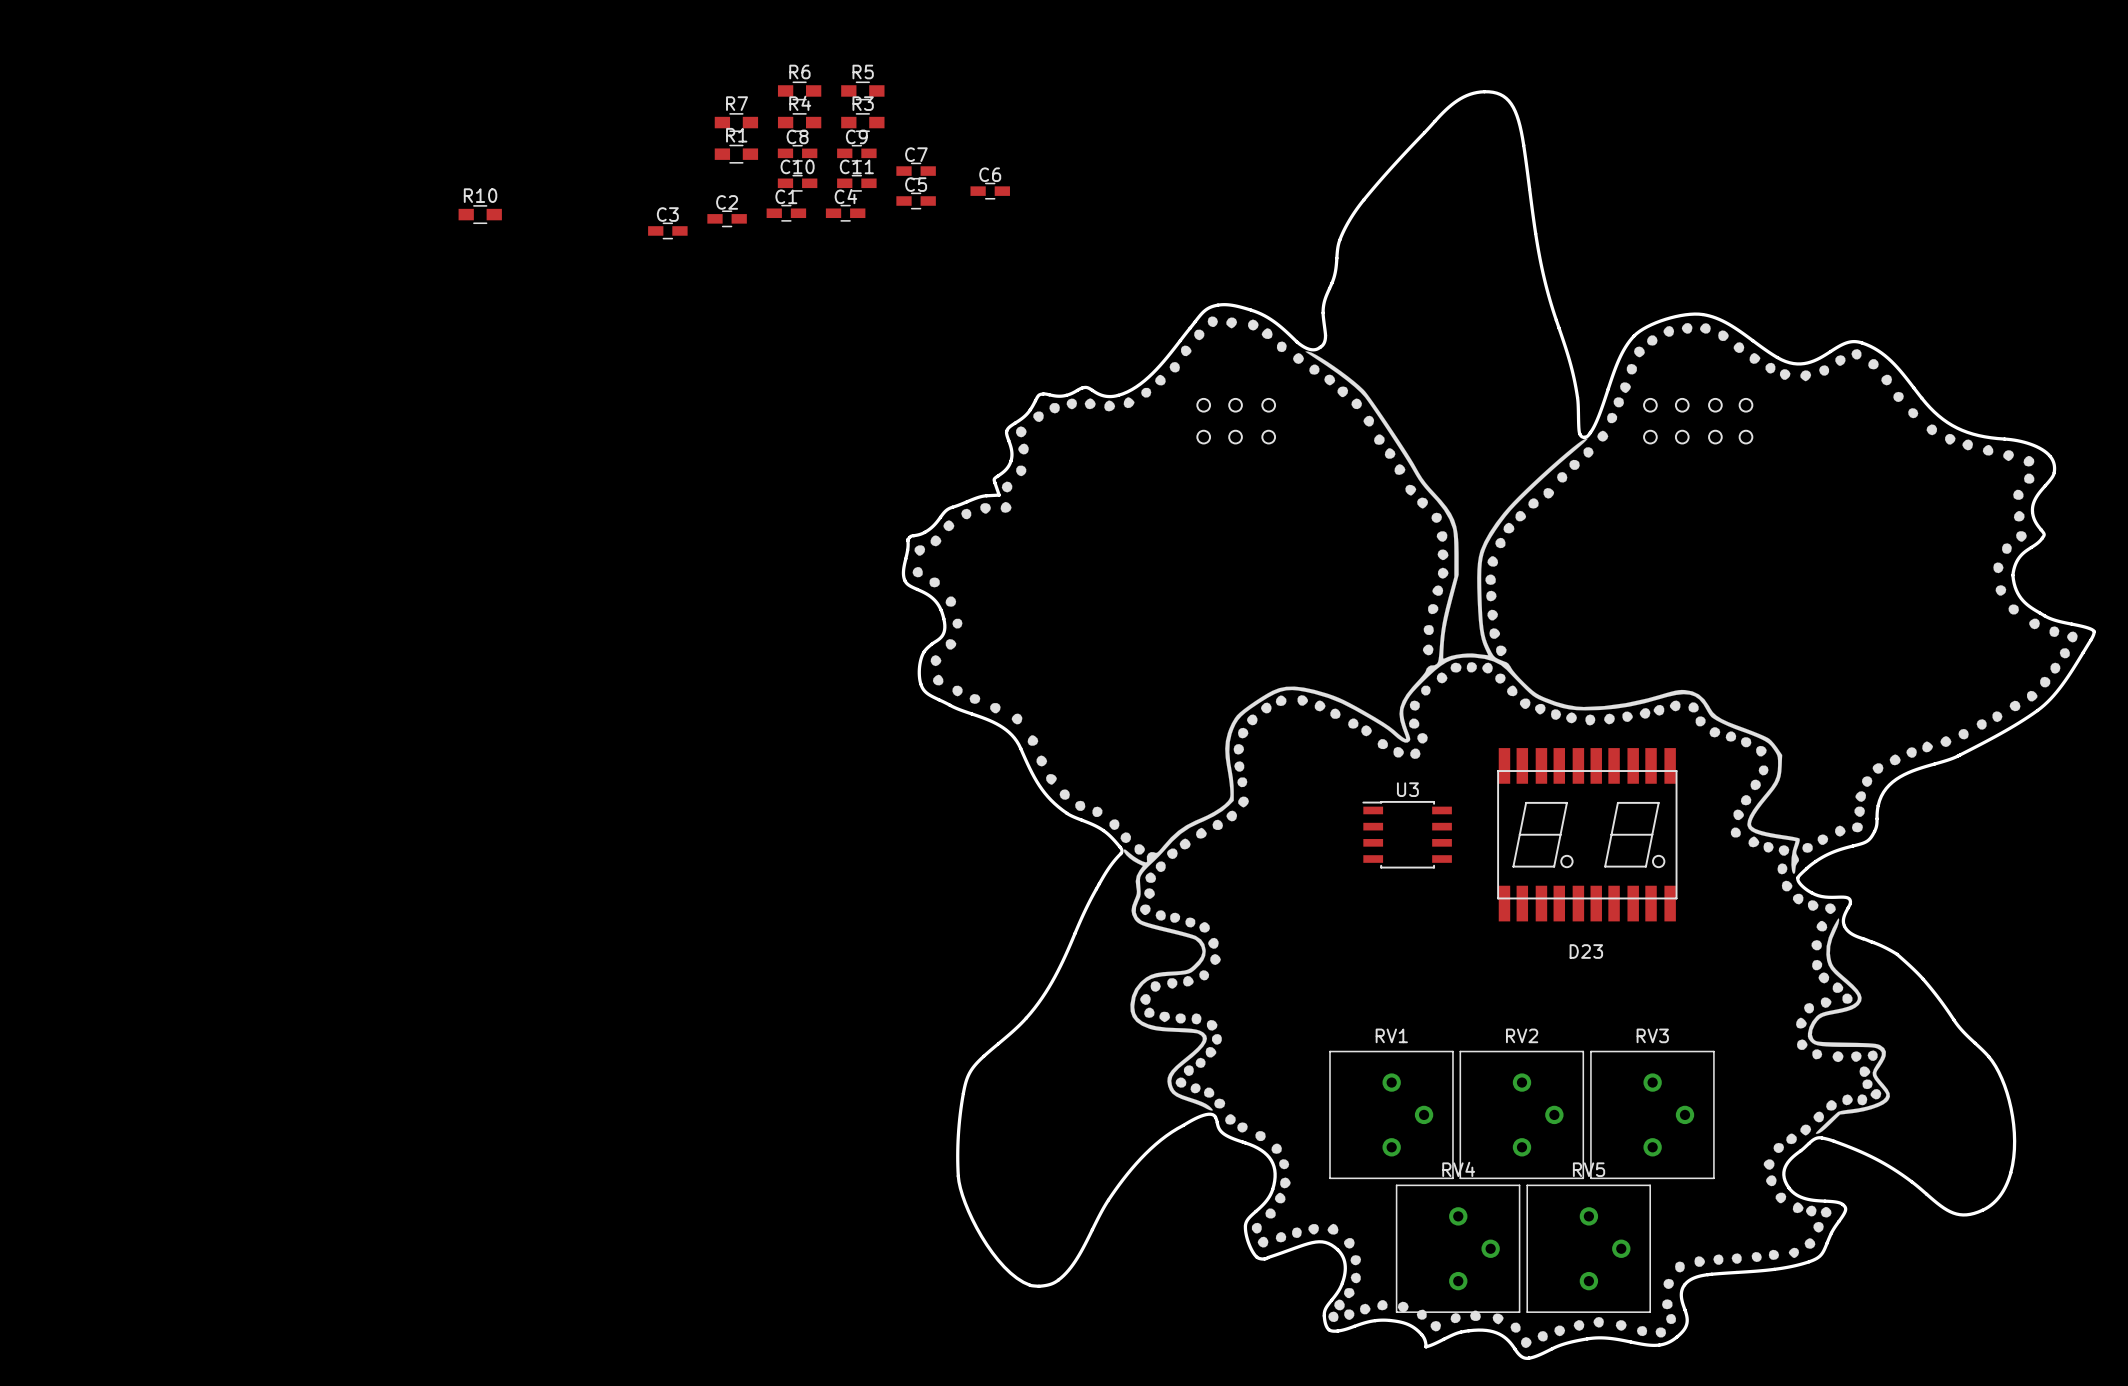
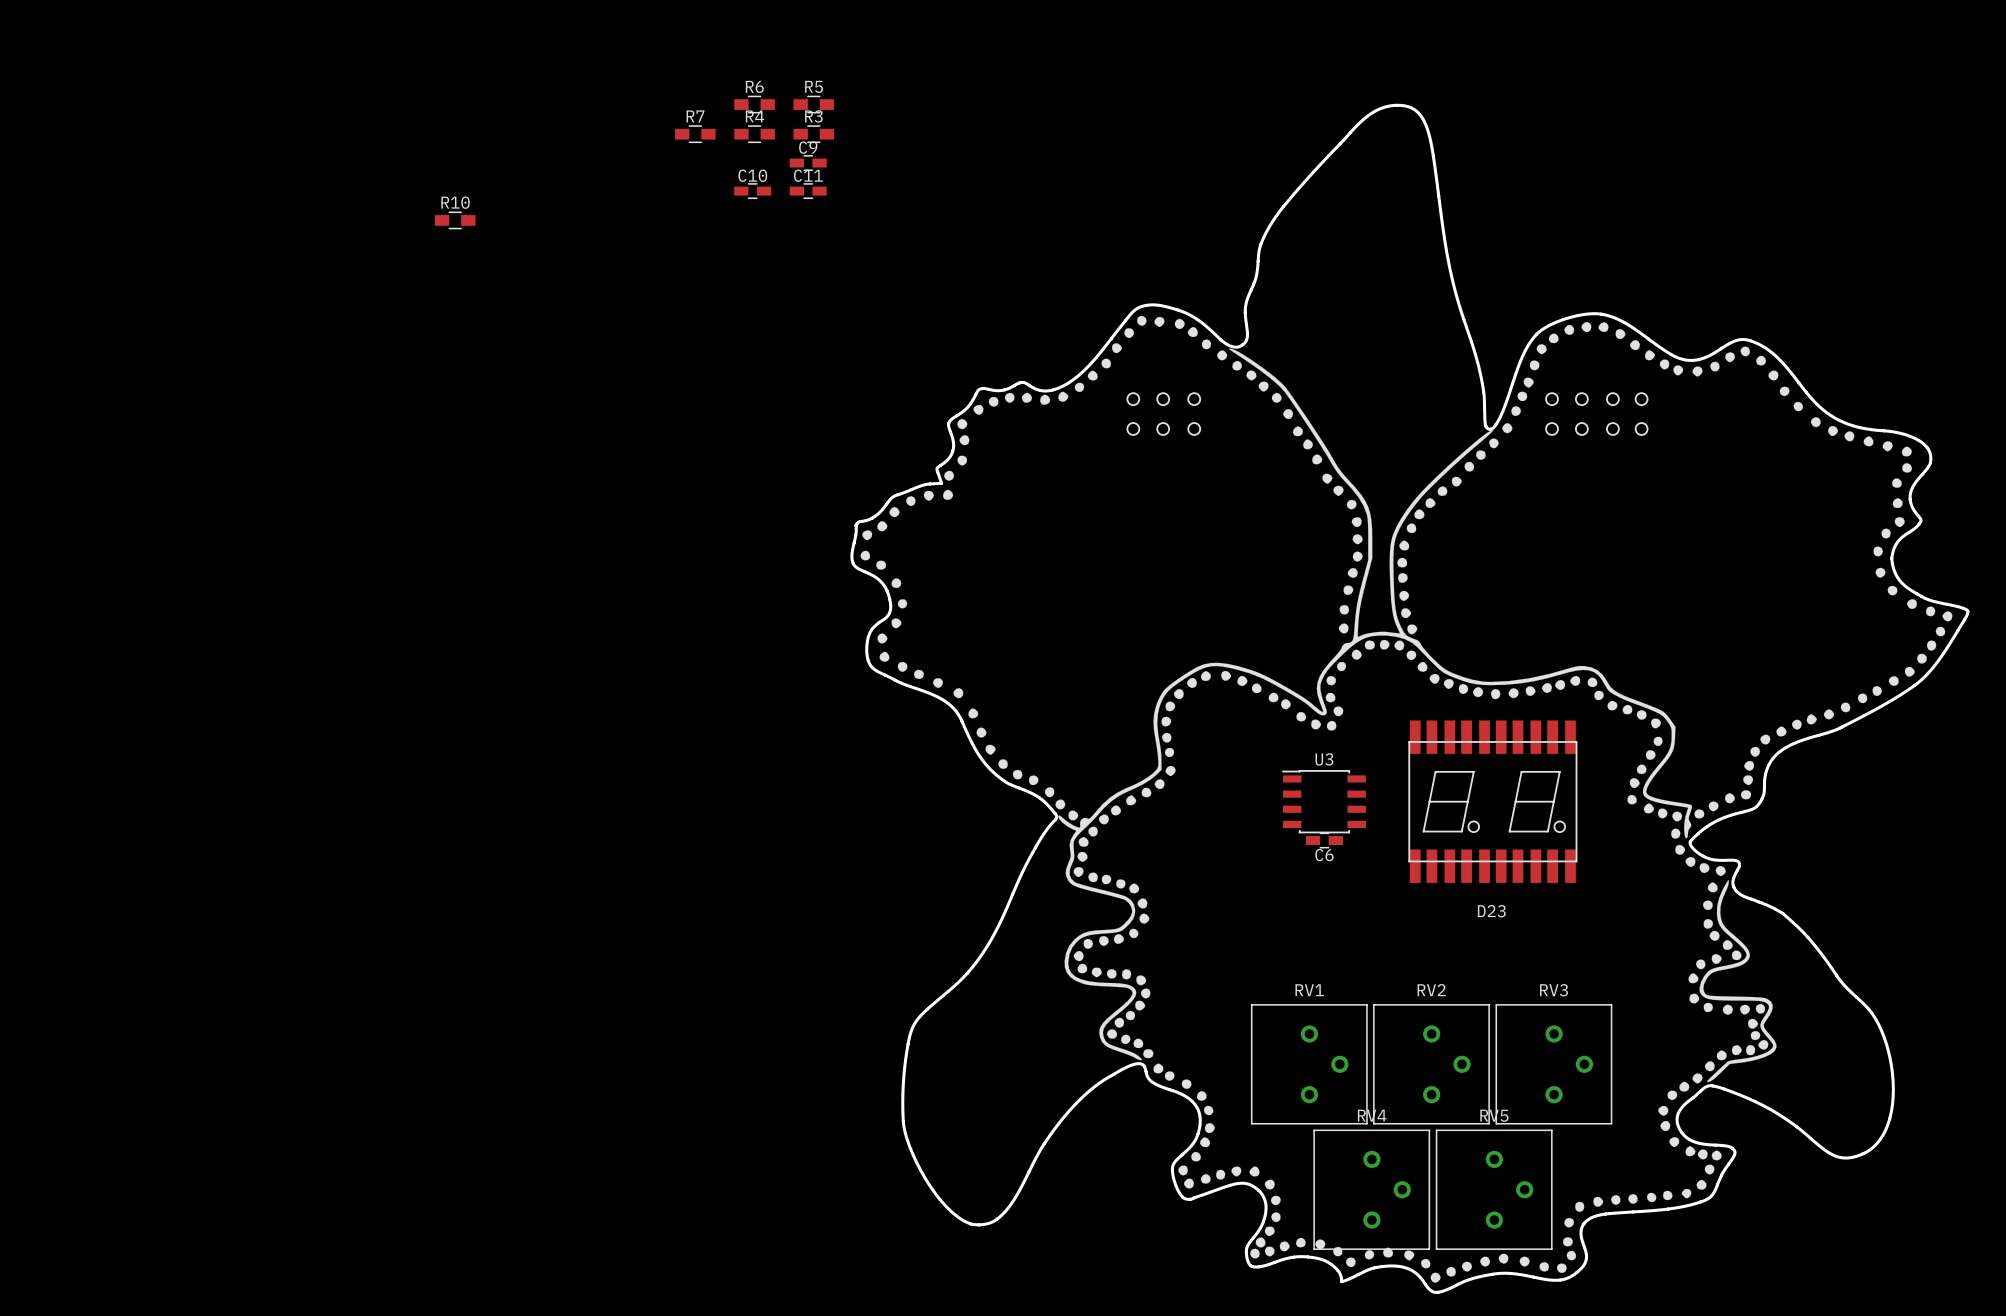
C8: (797, 153) -> none
R1: (736, 154) -> none
C7: (916, 171) -> none
C6 name position: C6 (990, 174) -> C6 (1324, 855)
C6 position: (990, 191) -> (1324, 840)
C5: (916, 201) -> none
C1: (786, 213) -> none
C4: (845, 213) -> none
C2: (727, 218) -> none
C3: (667, 230) -> none

